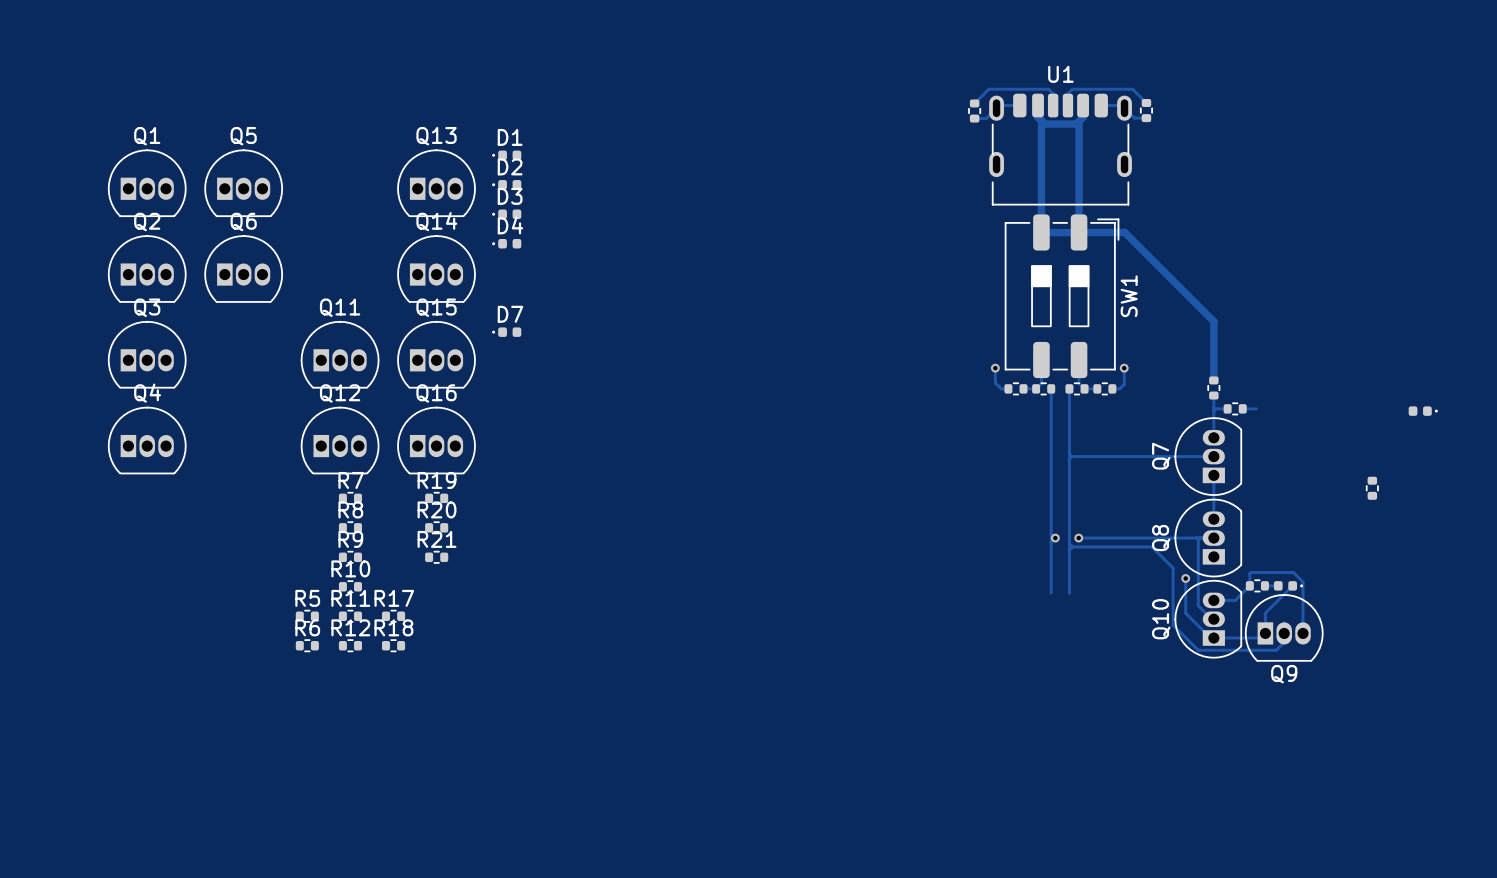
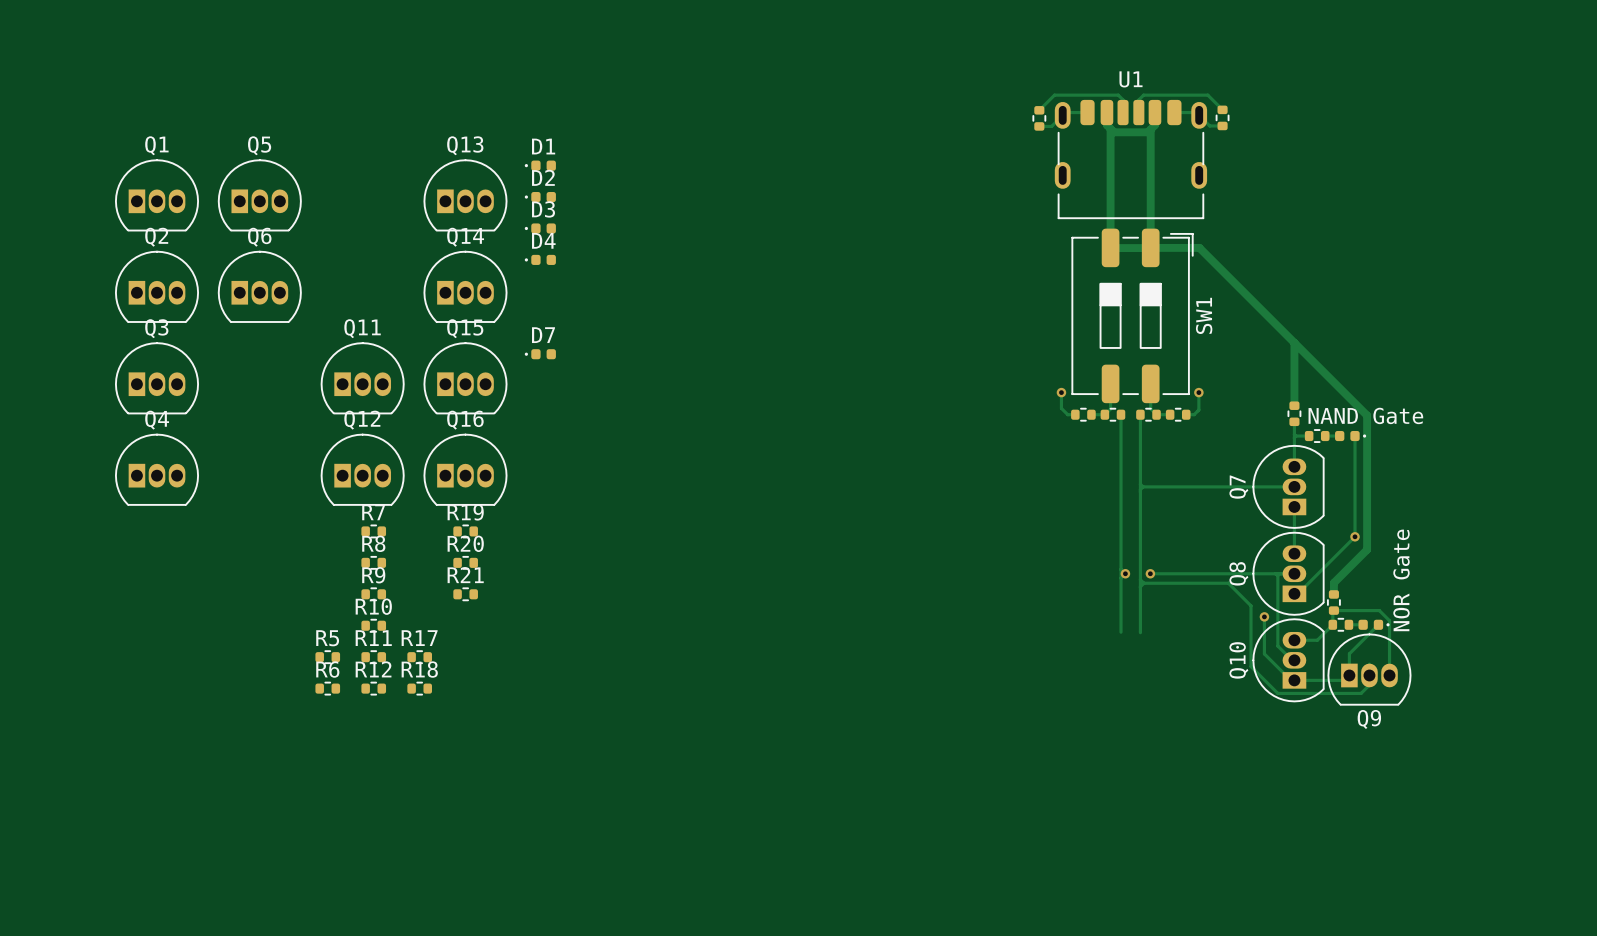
track: none -> (1294, 342) (1367, 415) (1367, 549) (1333, 582) (1333, 594)
text: none -> NAND Gate (1365, 415)
track: none -> (1355, 436) (1355, 536) (1297, 593)
part position: (1423, 411) -> (1350, 436)
part position: (1372, 488) -> (1333, 602)
via: none -> (1355, 536)
text: none -> NOR Gate (1401, 580)

